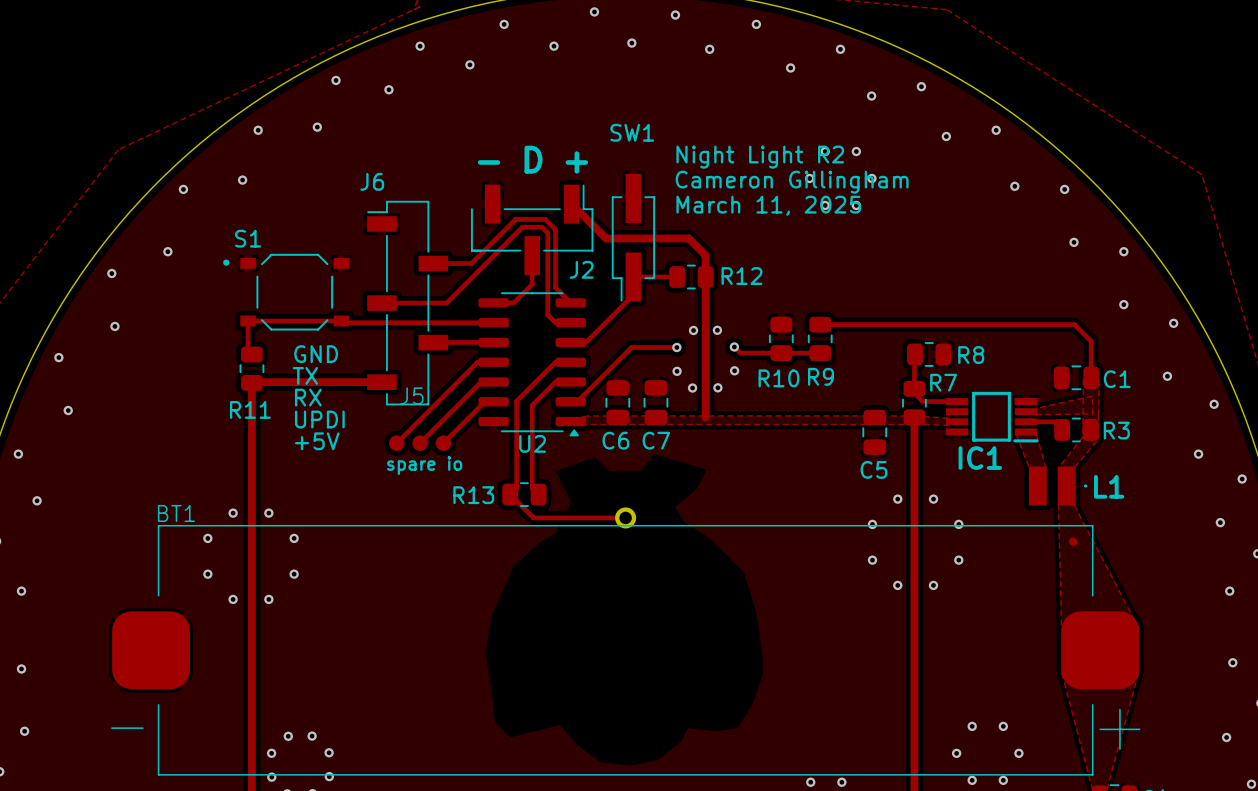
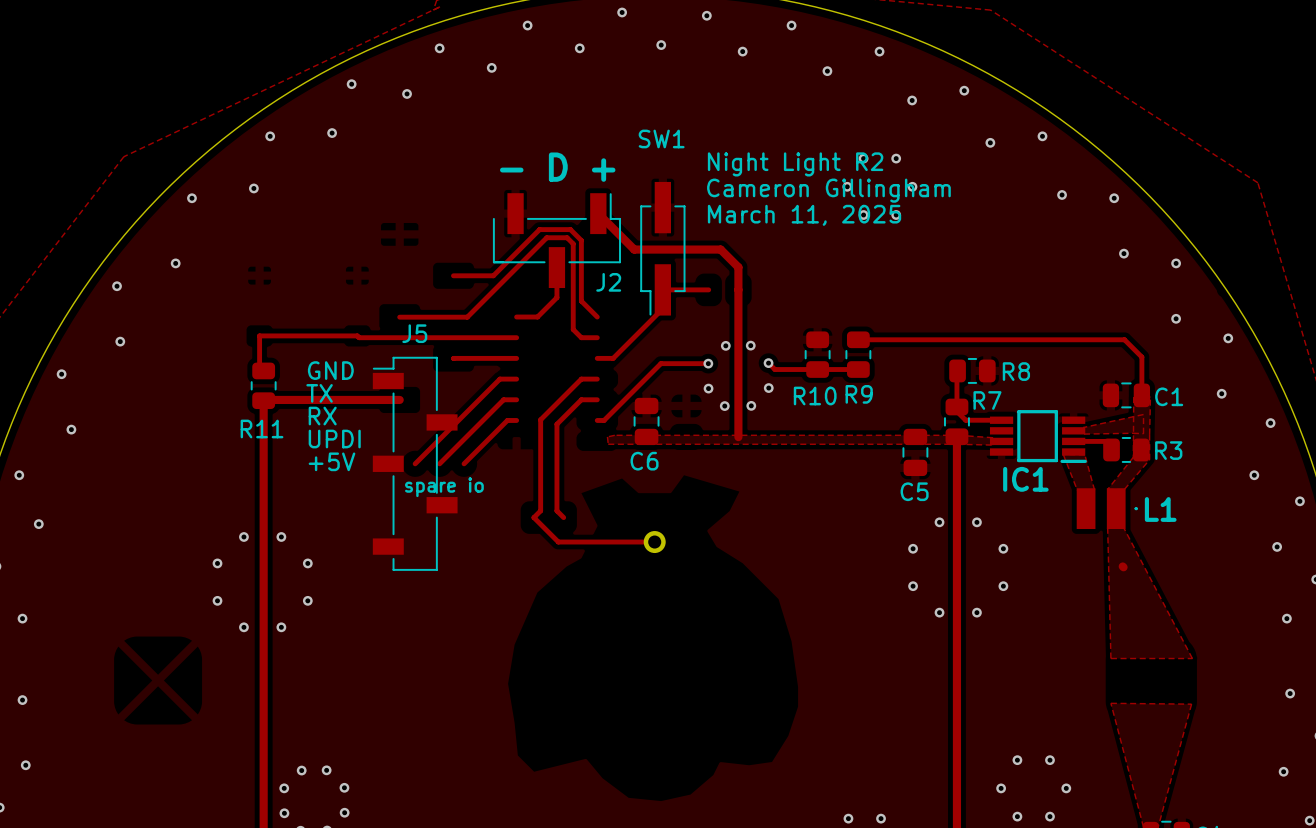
R12: (691, 277) -> none
S1: (286, 292) -> none
J6: (407, 303) -> none
U2: (532, 364) -> none
J5 name position: J5 (411, 395) -> J5 (414, 333)
C7: (655, 402) -> none
J5 footprint: [388, 435, 452, 451] -> [372, 356, 458, 571]
R13: (524, 494) -> none
BT1: (625, 650) -> none

